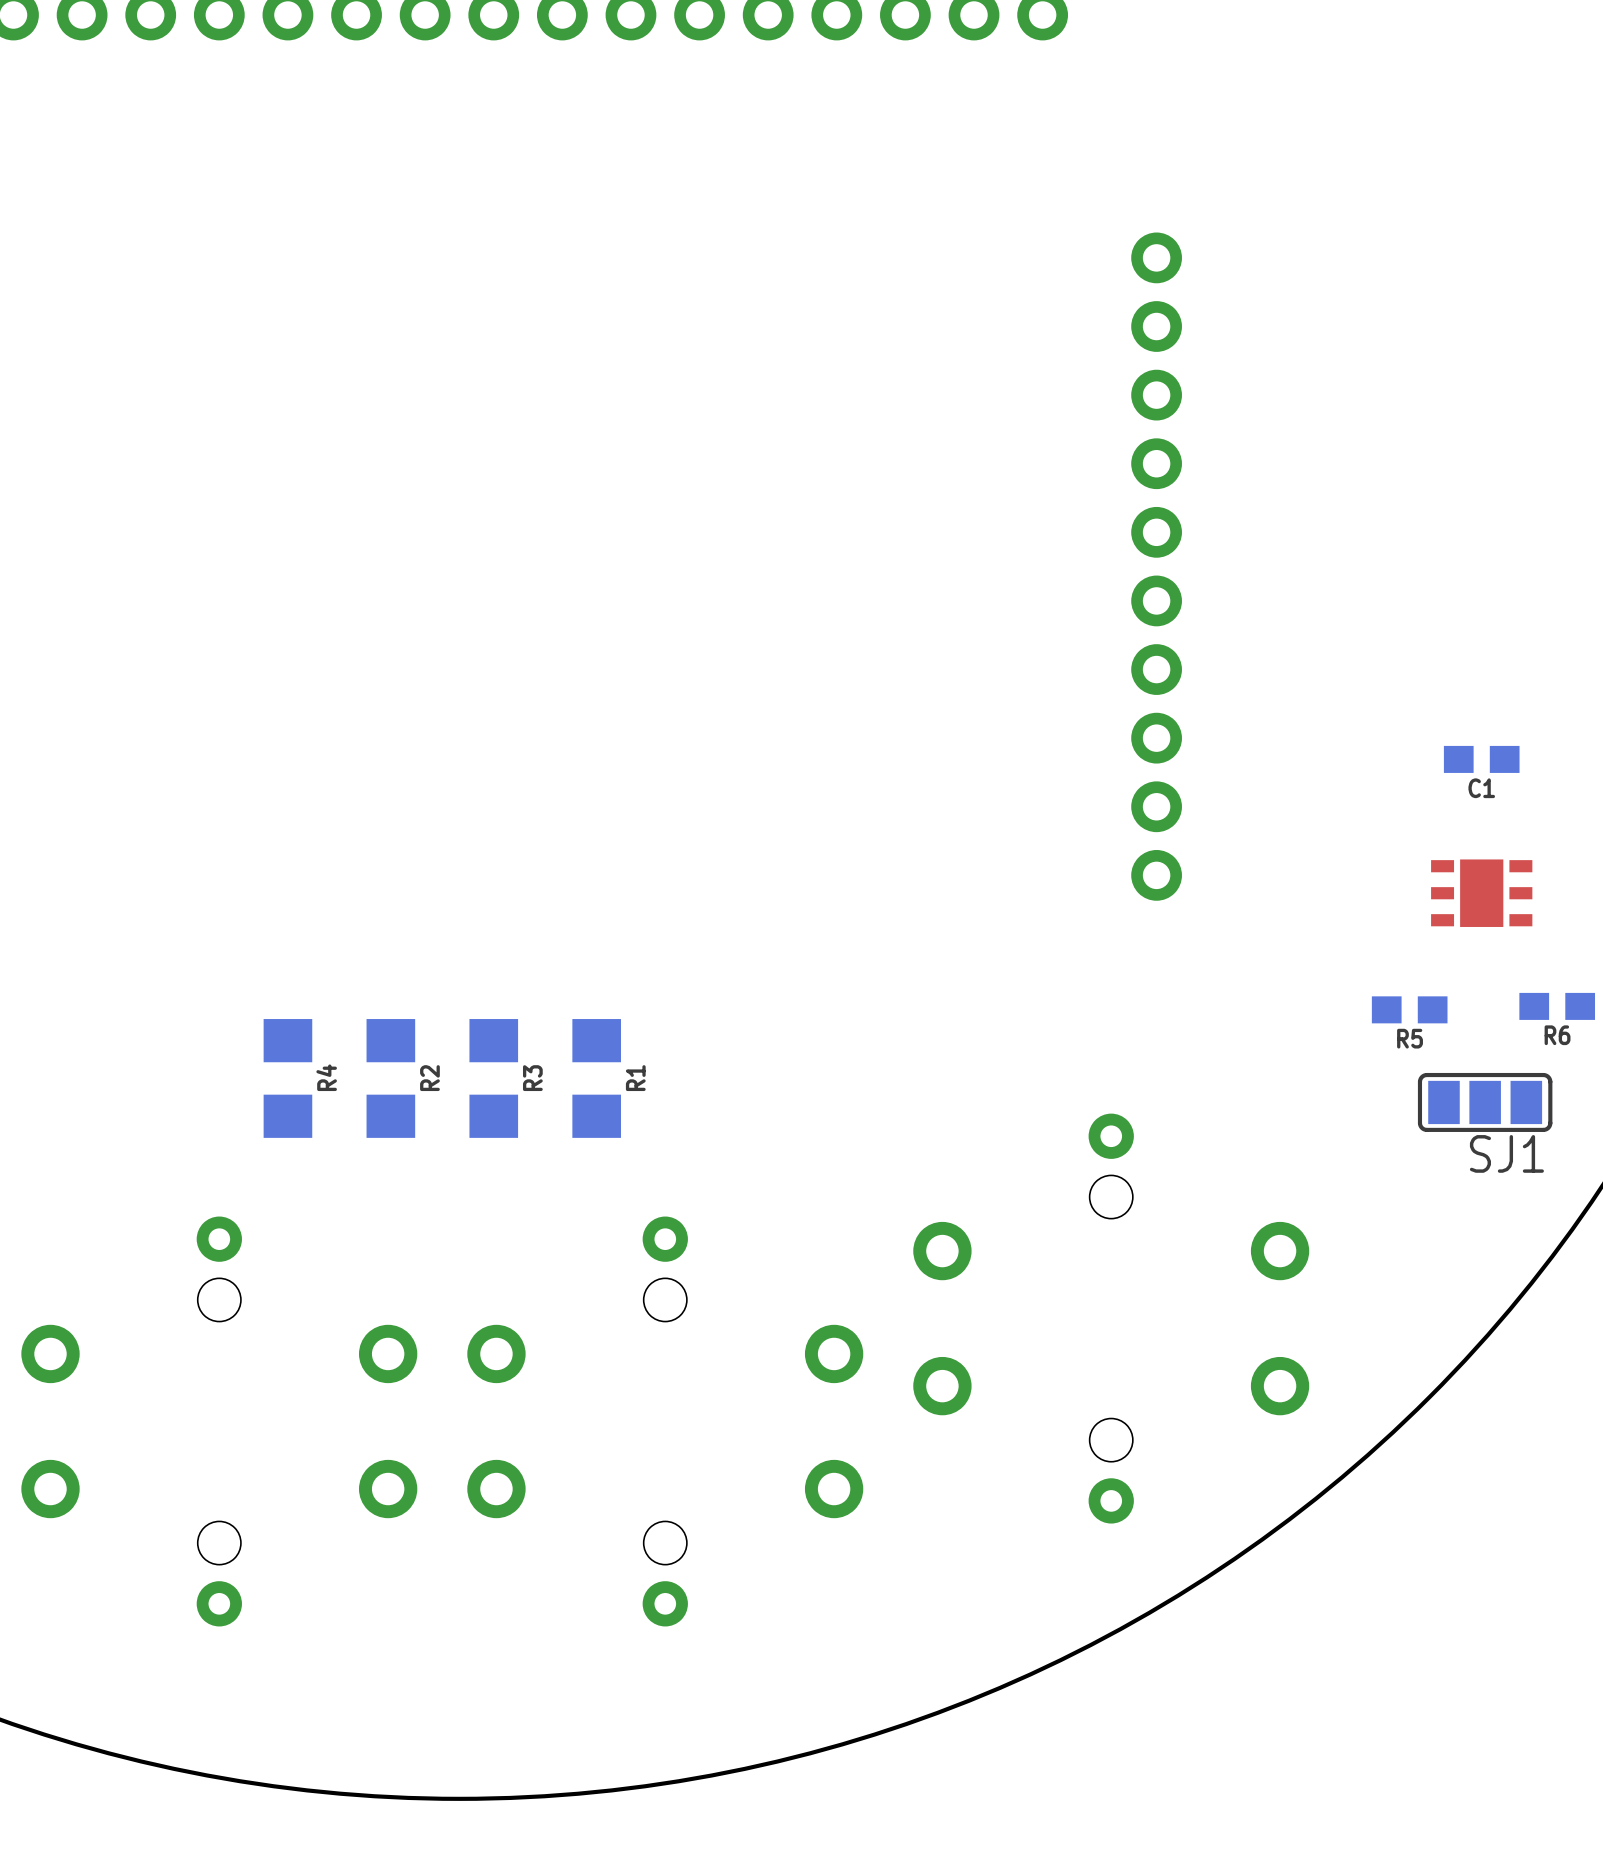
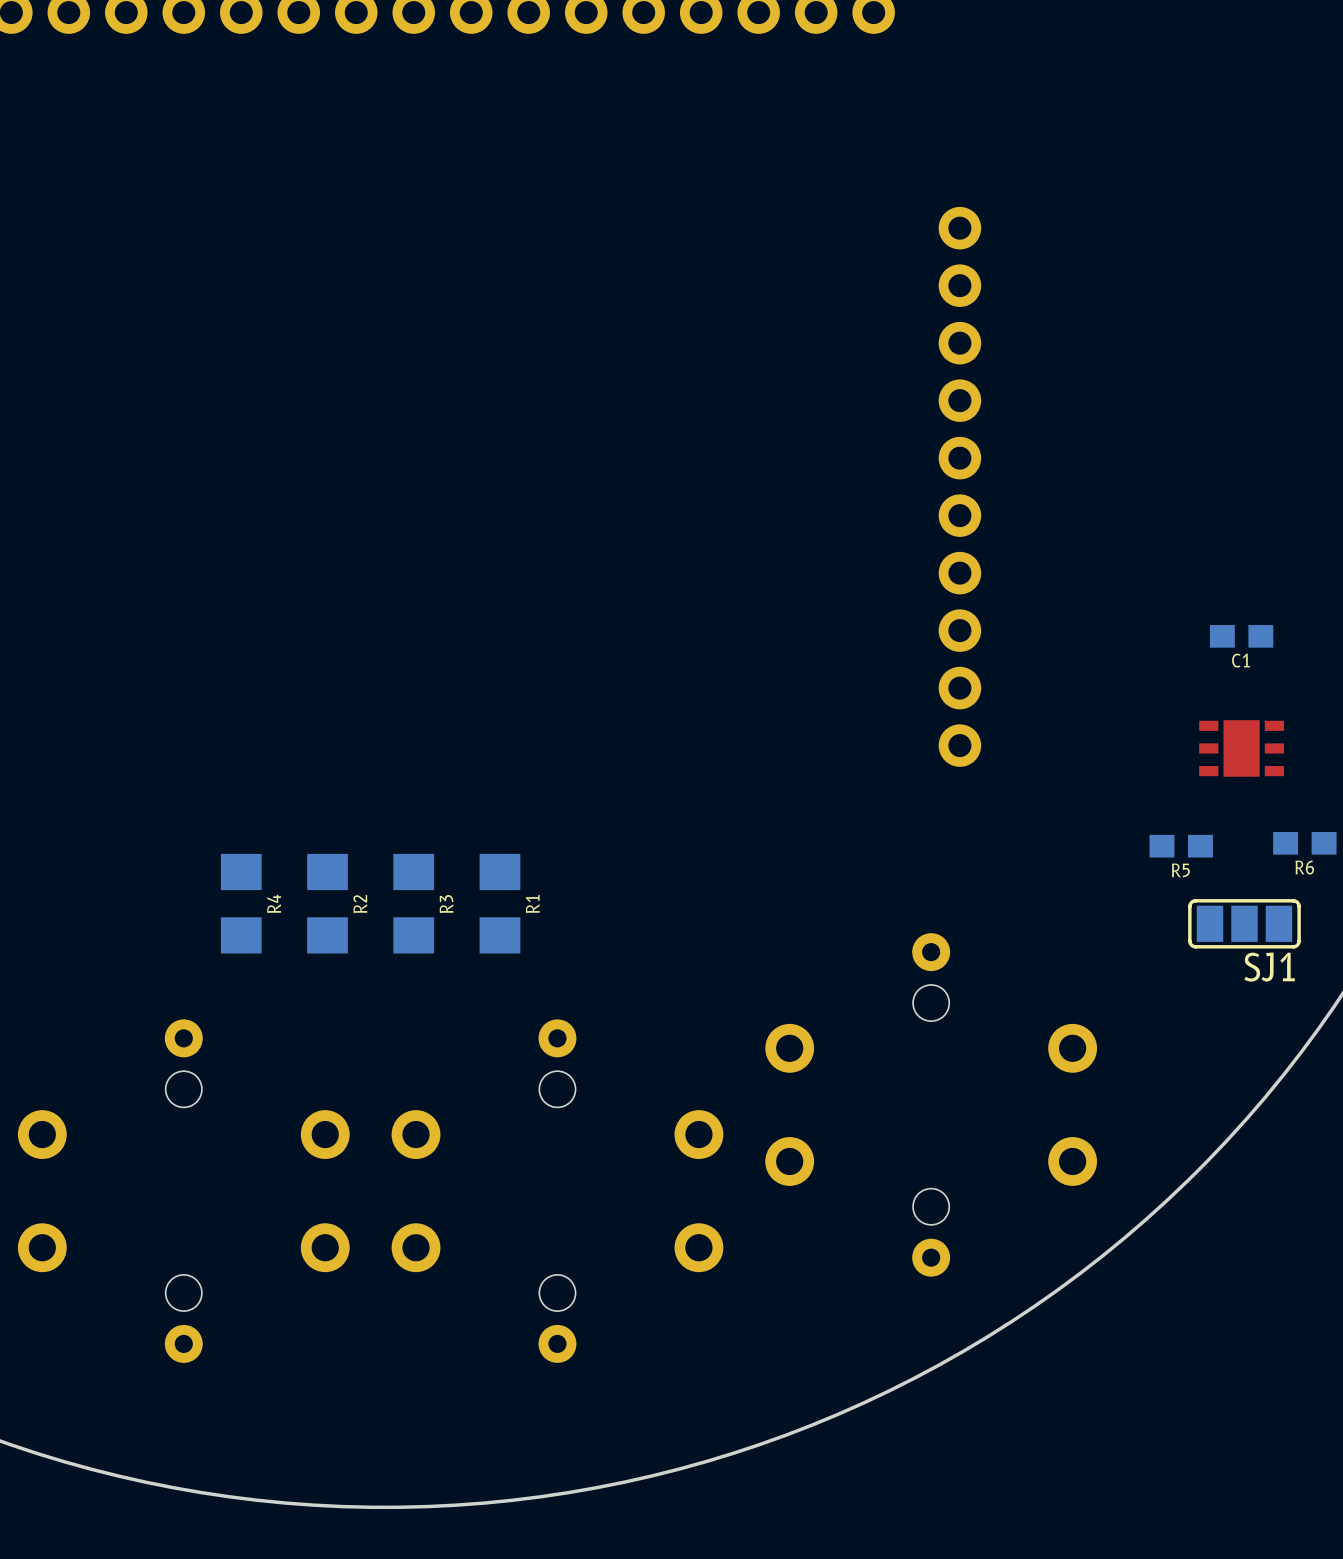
part position: (1156, 566) -> (959, 486)

